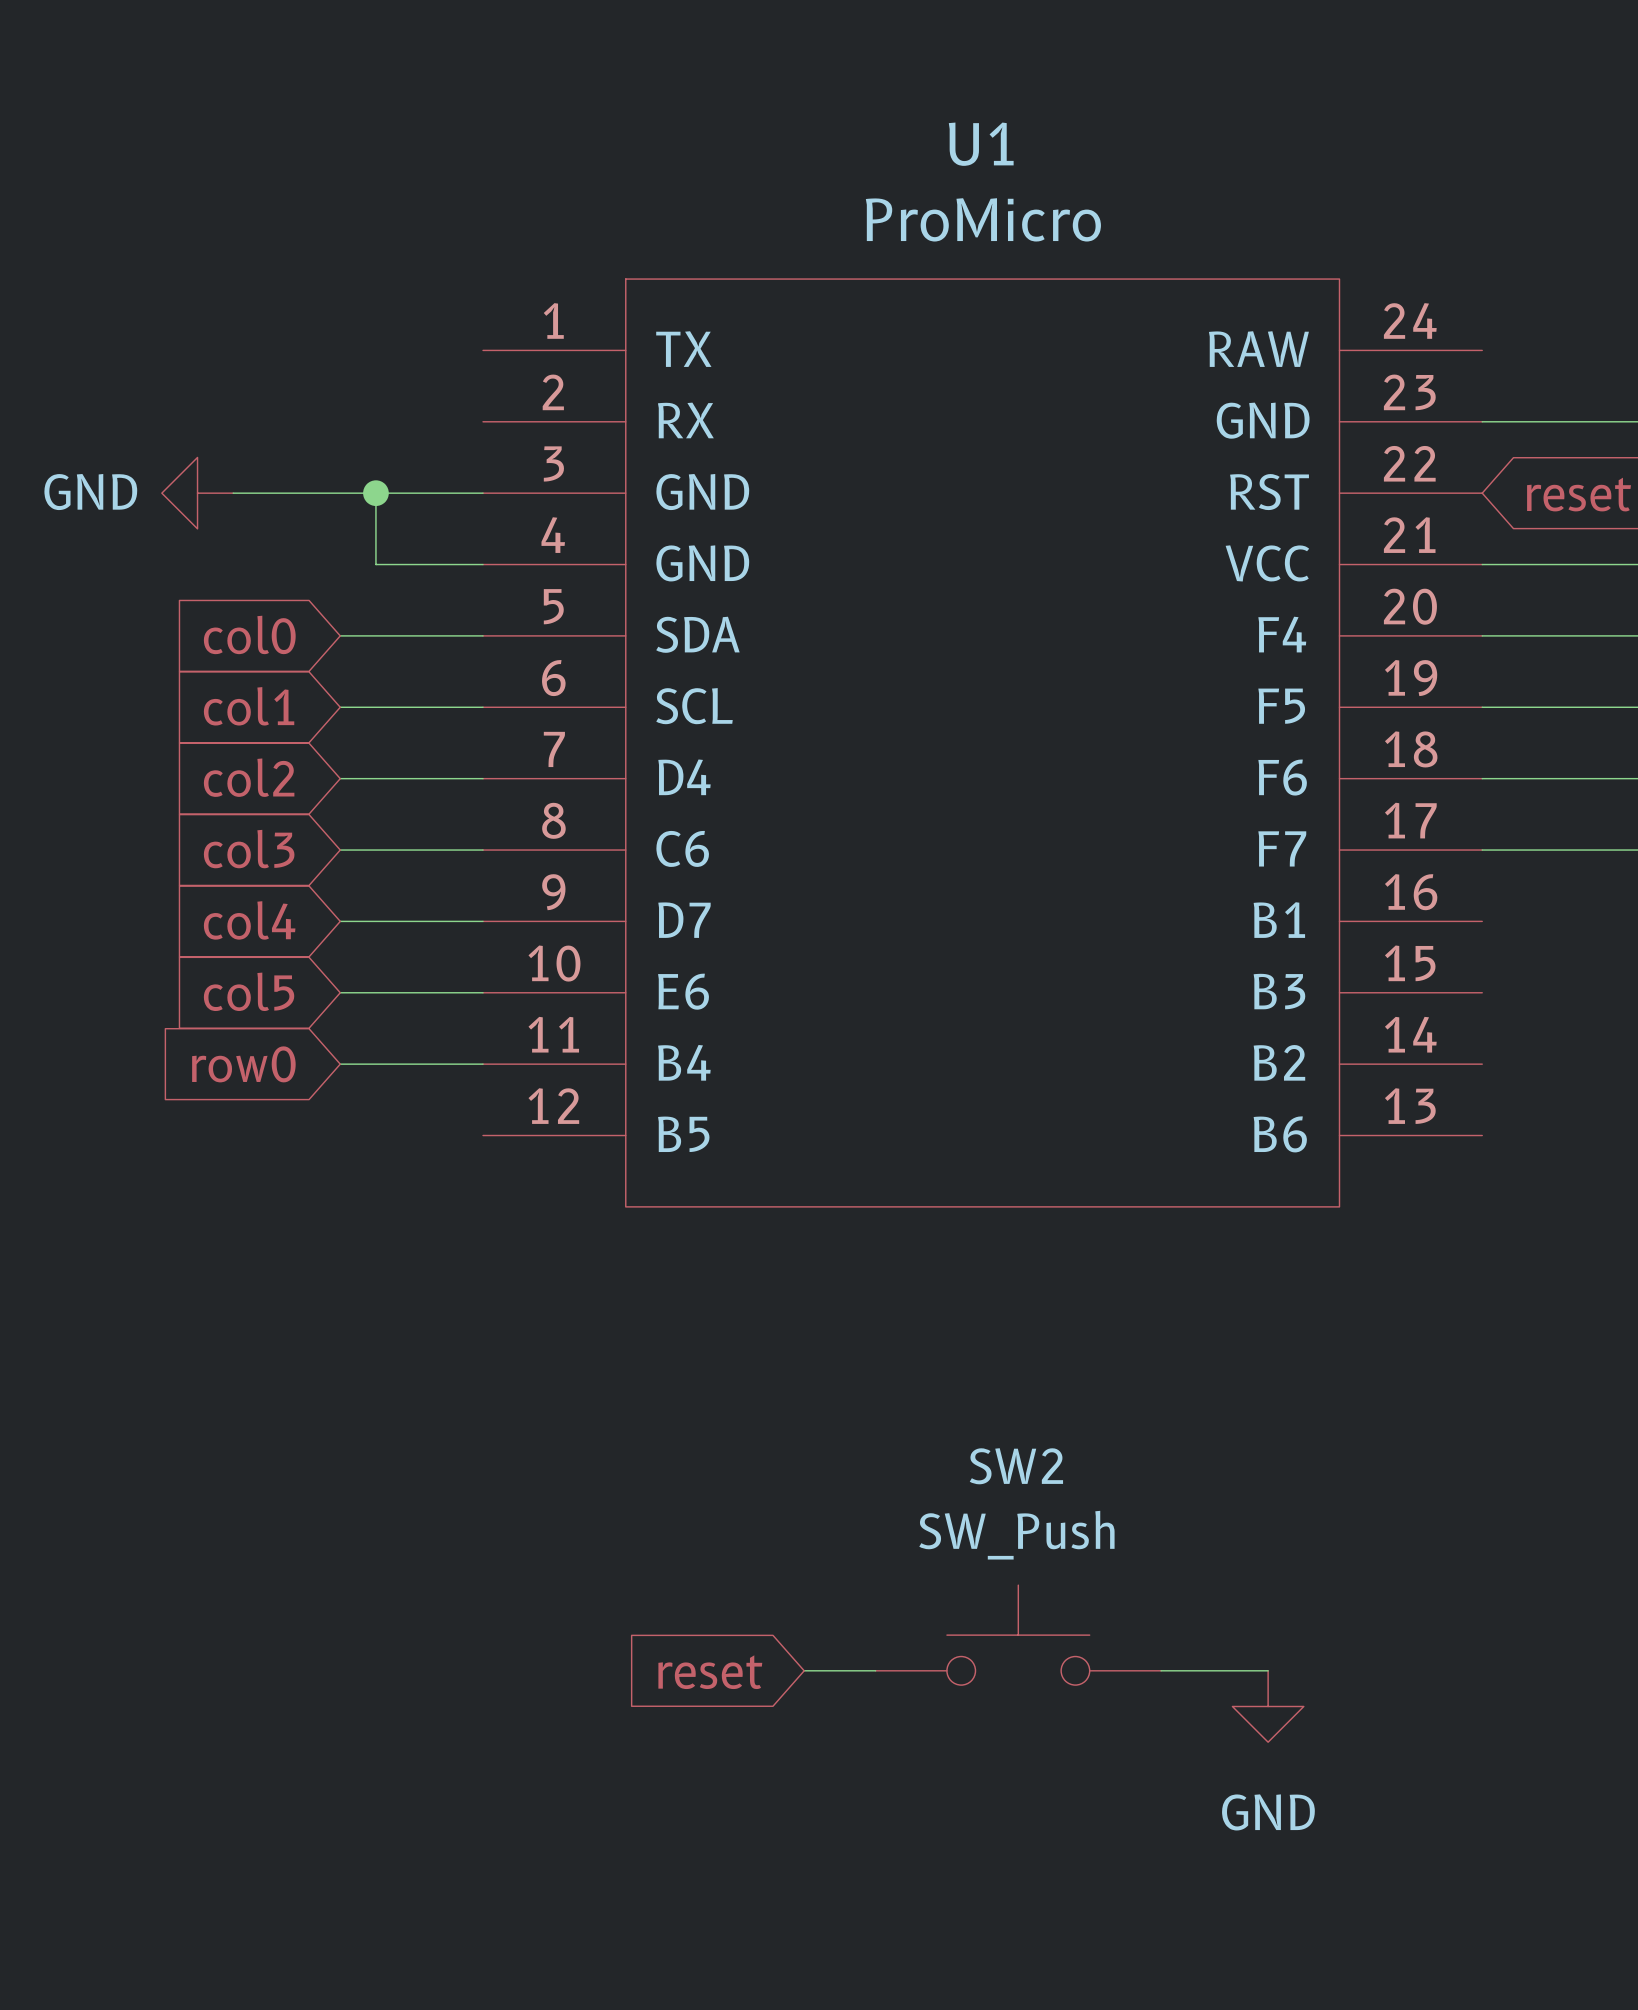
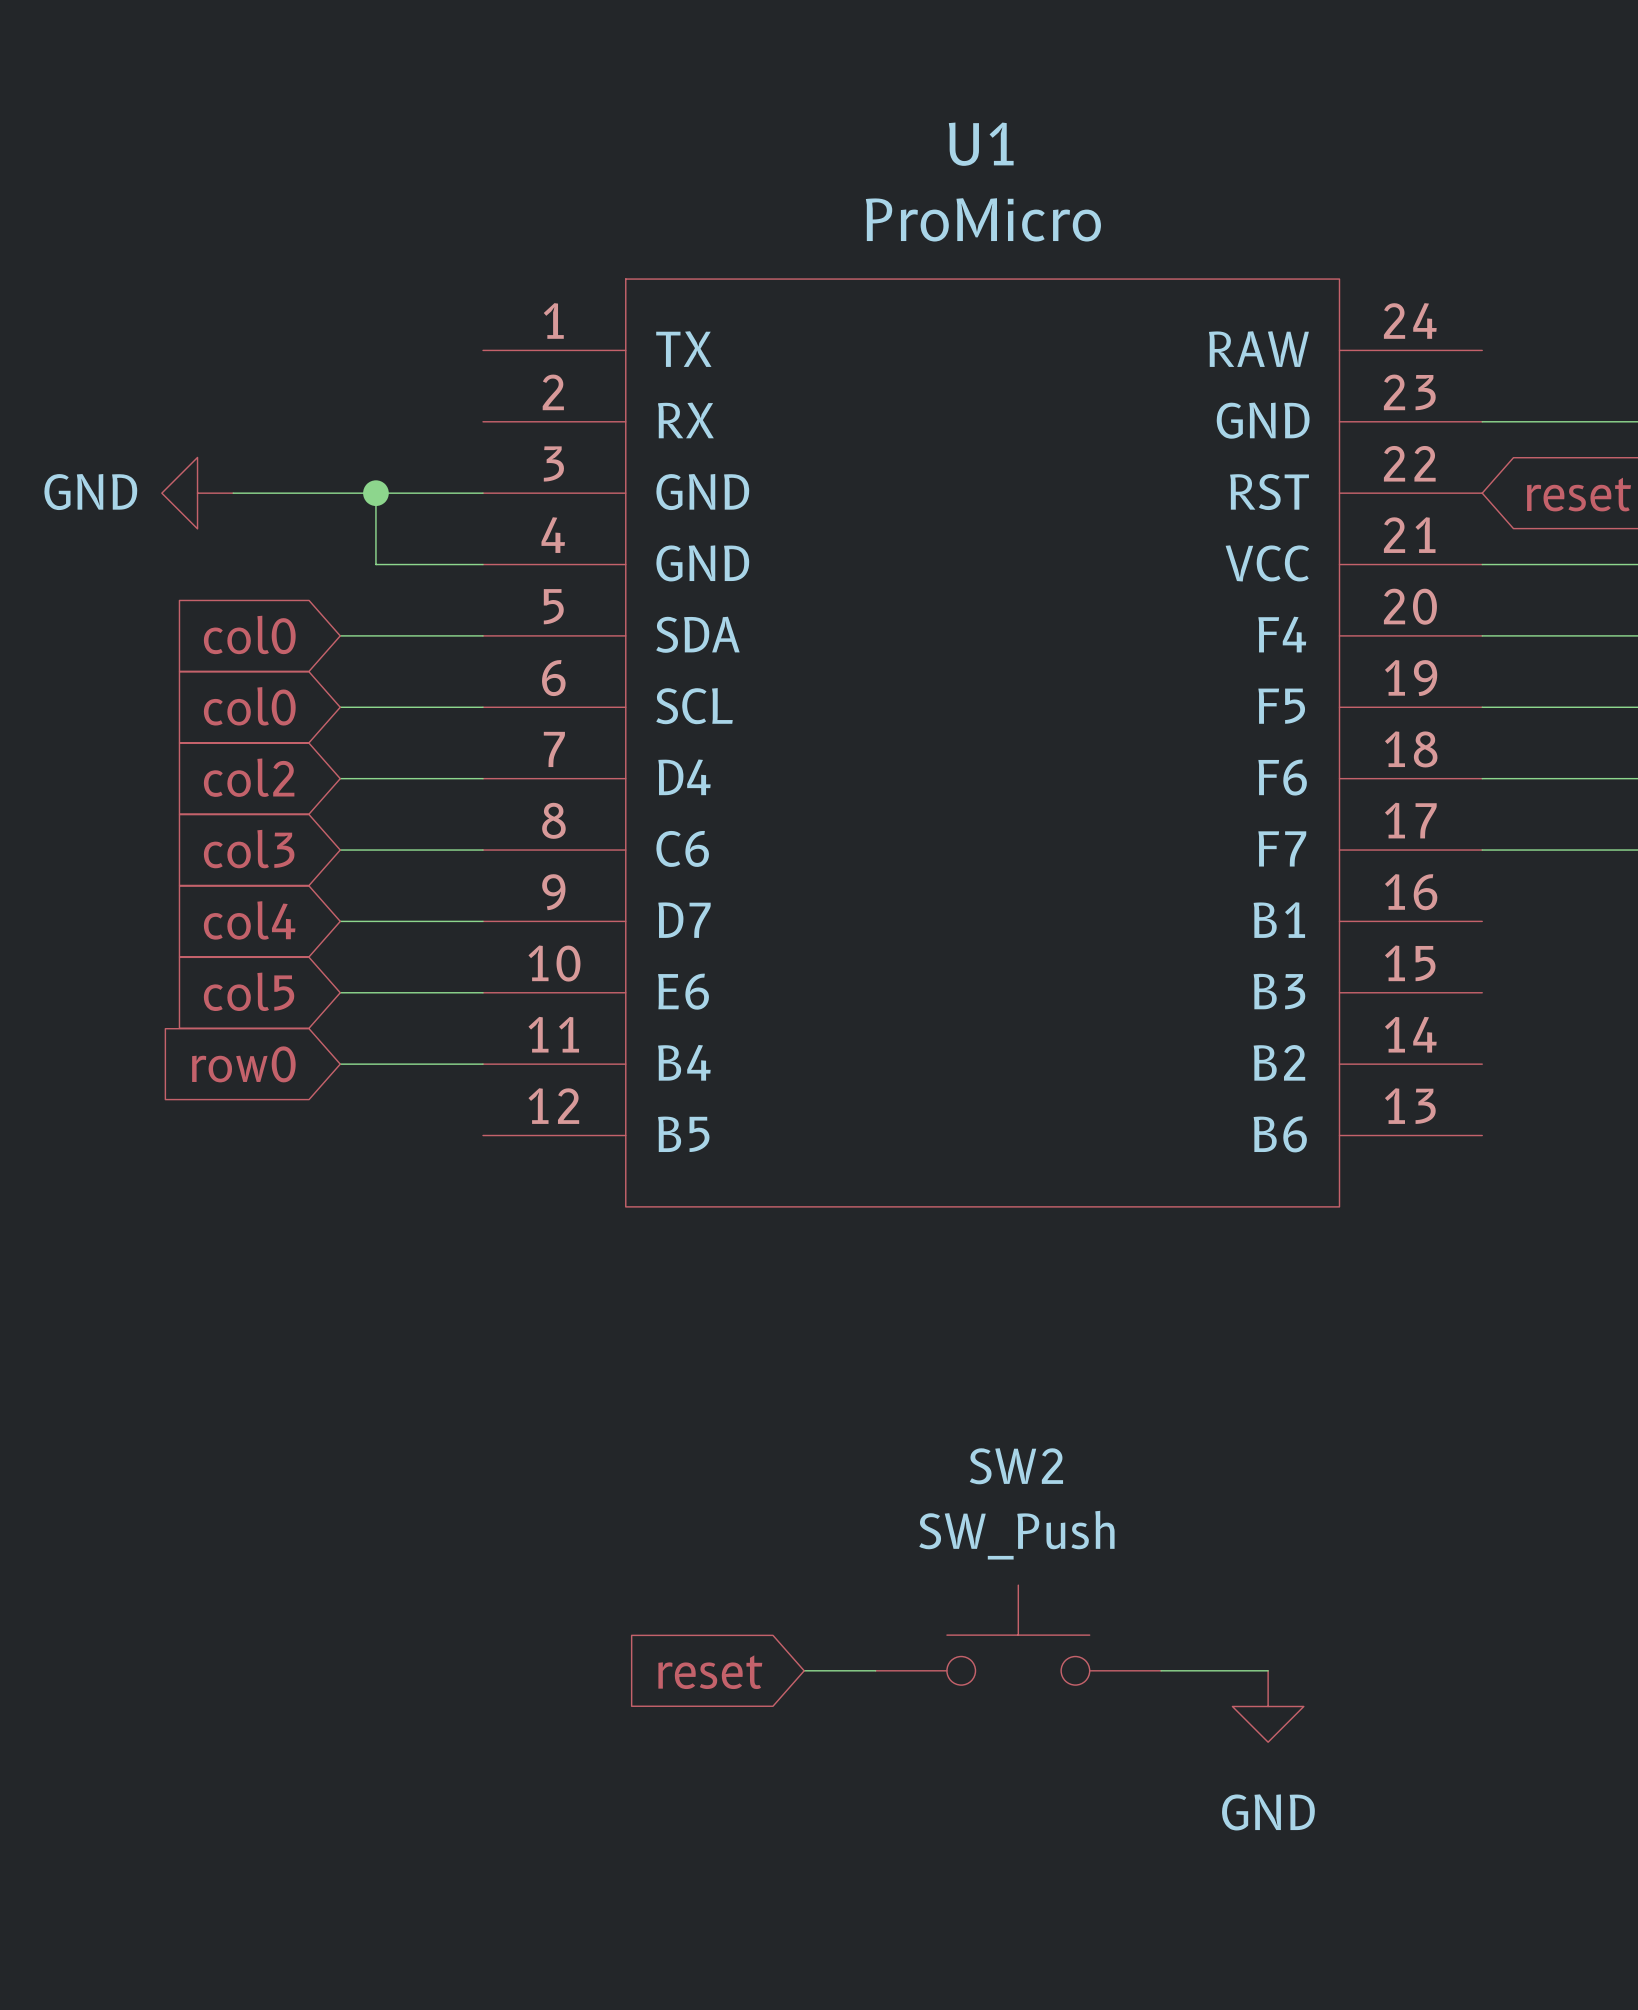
global label: col1 (249, 706) -> col0 (249, 706)

